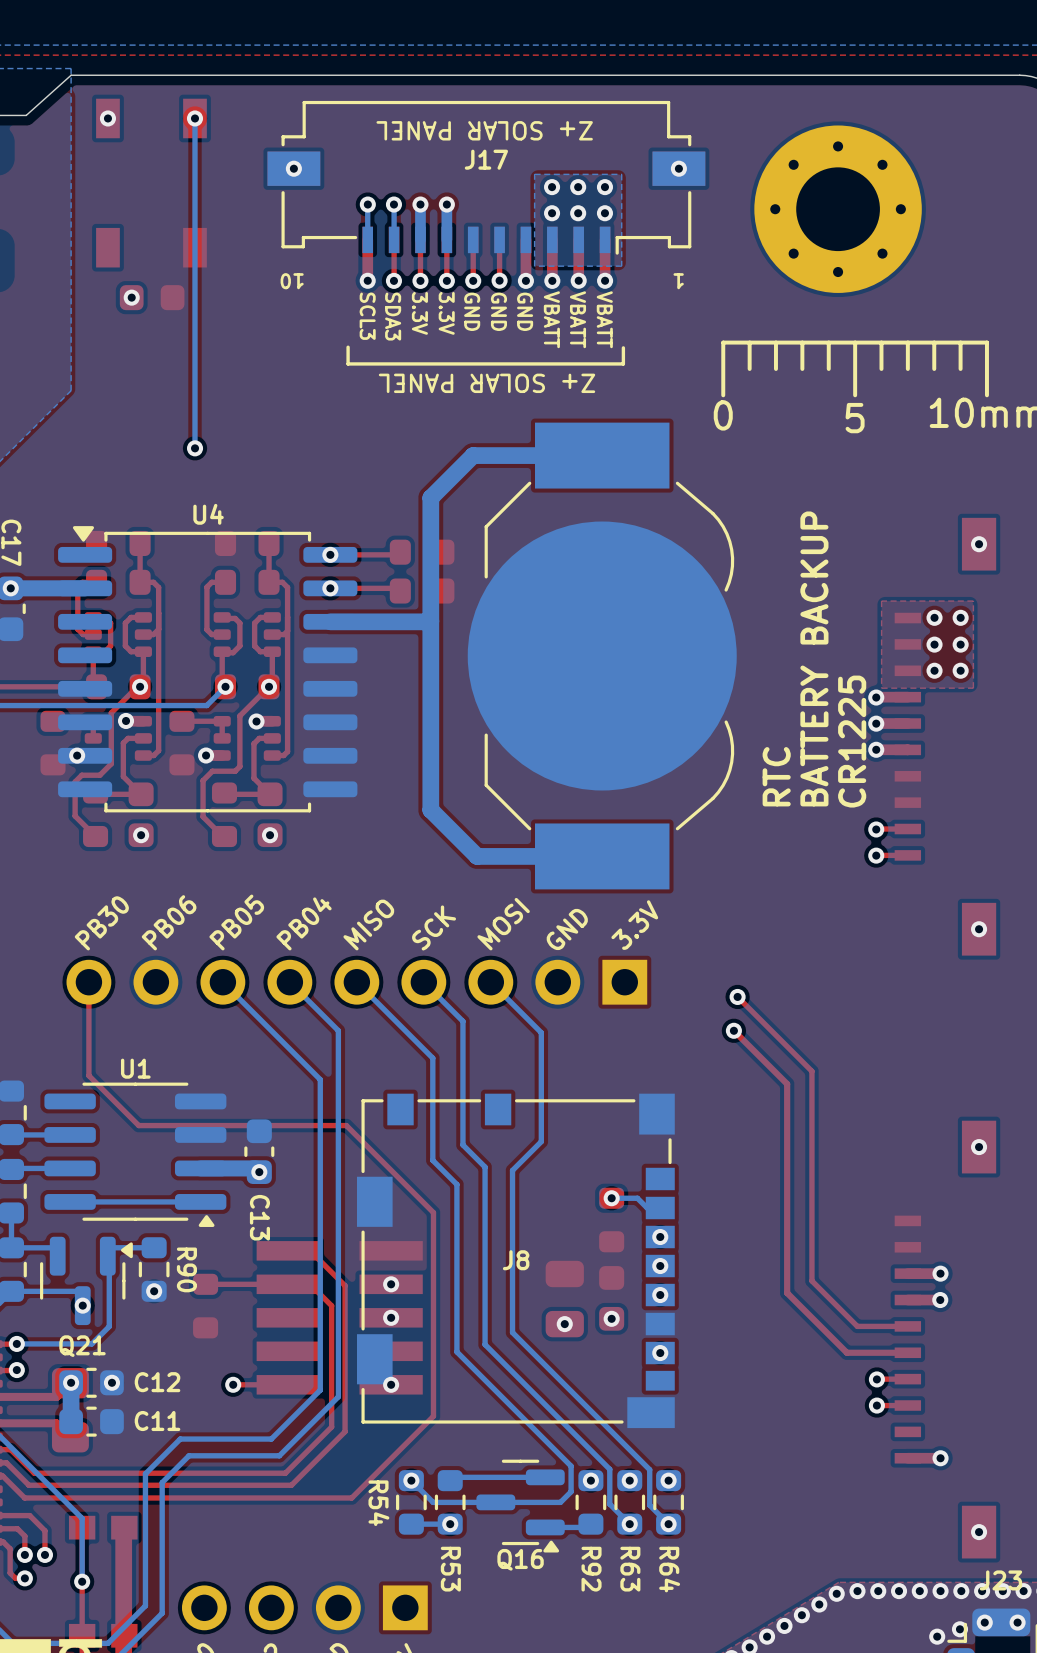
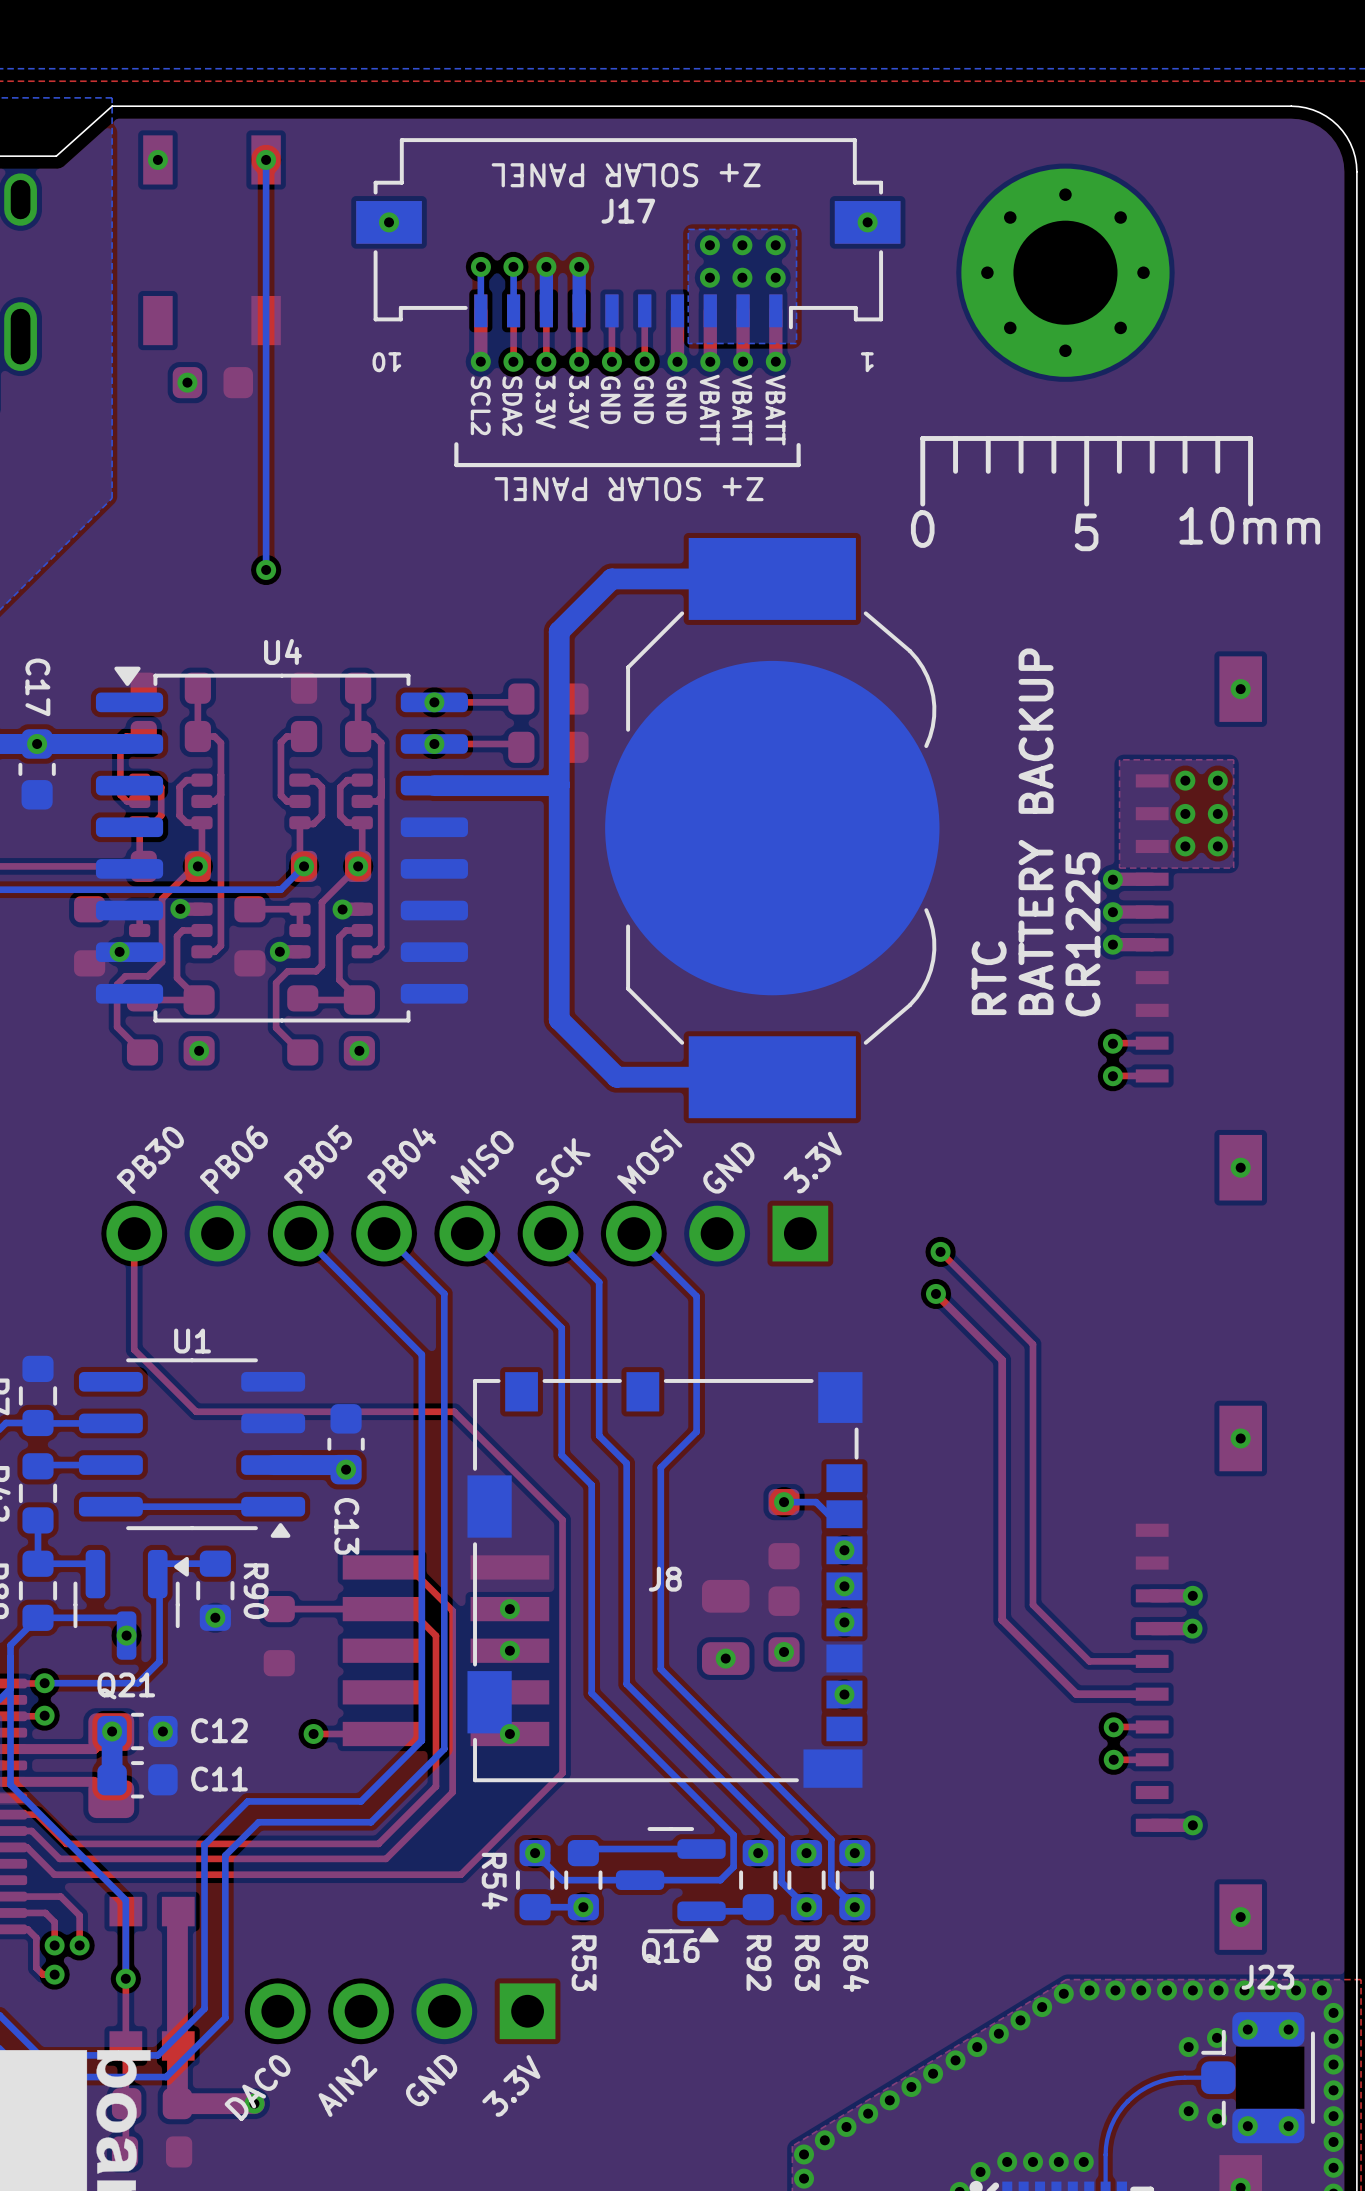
text: SCL3 (367, 316) -> SCL2 (480, 405)
text: SDA3 (393, 316) -> SDA2 (512, 406)

